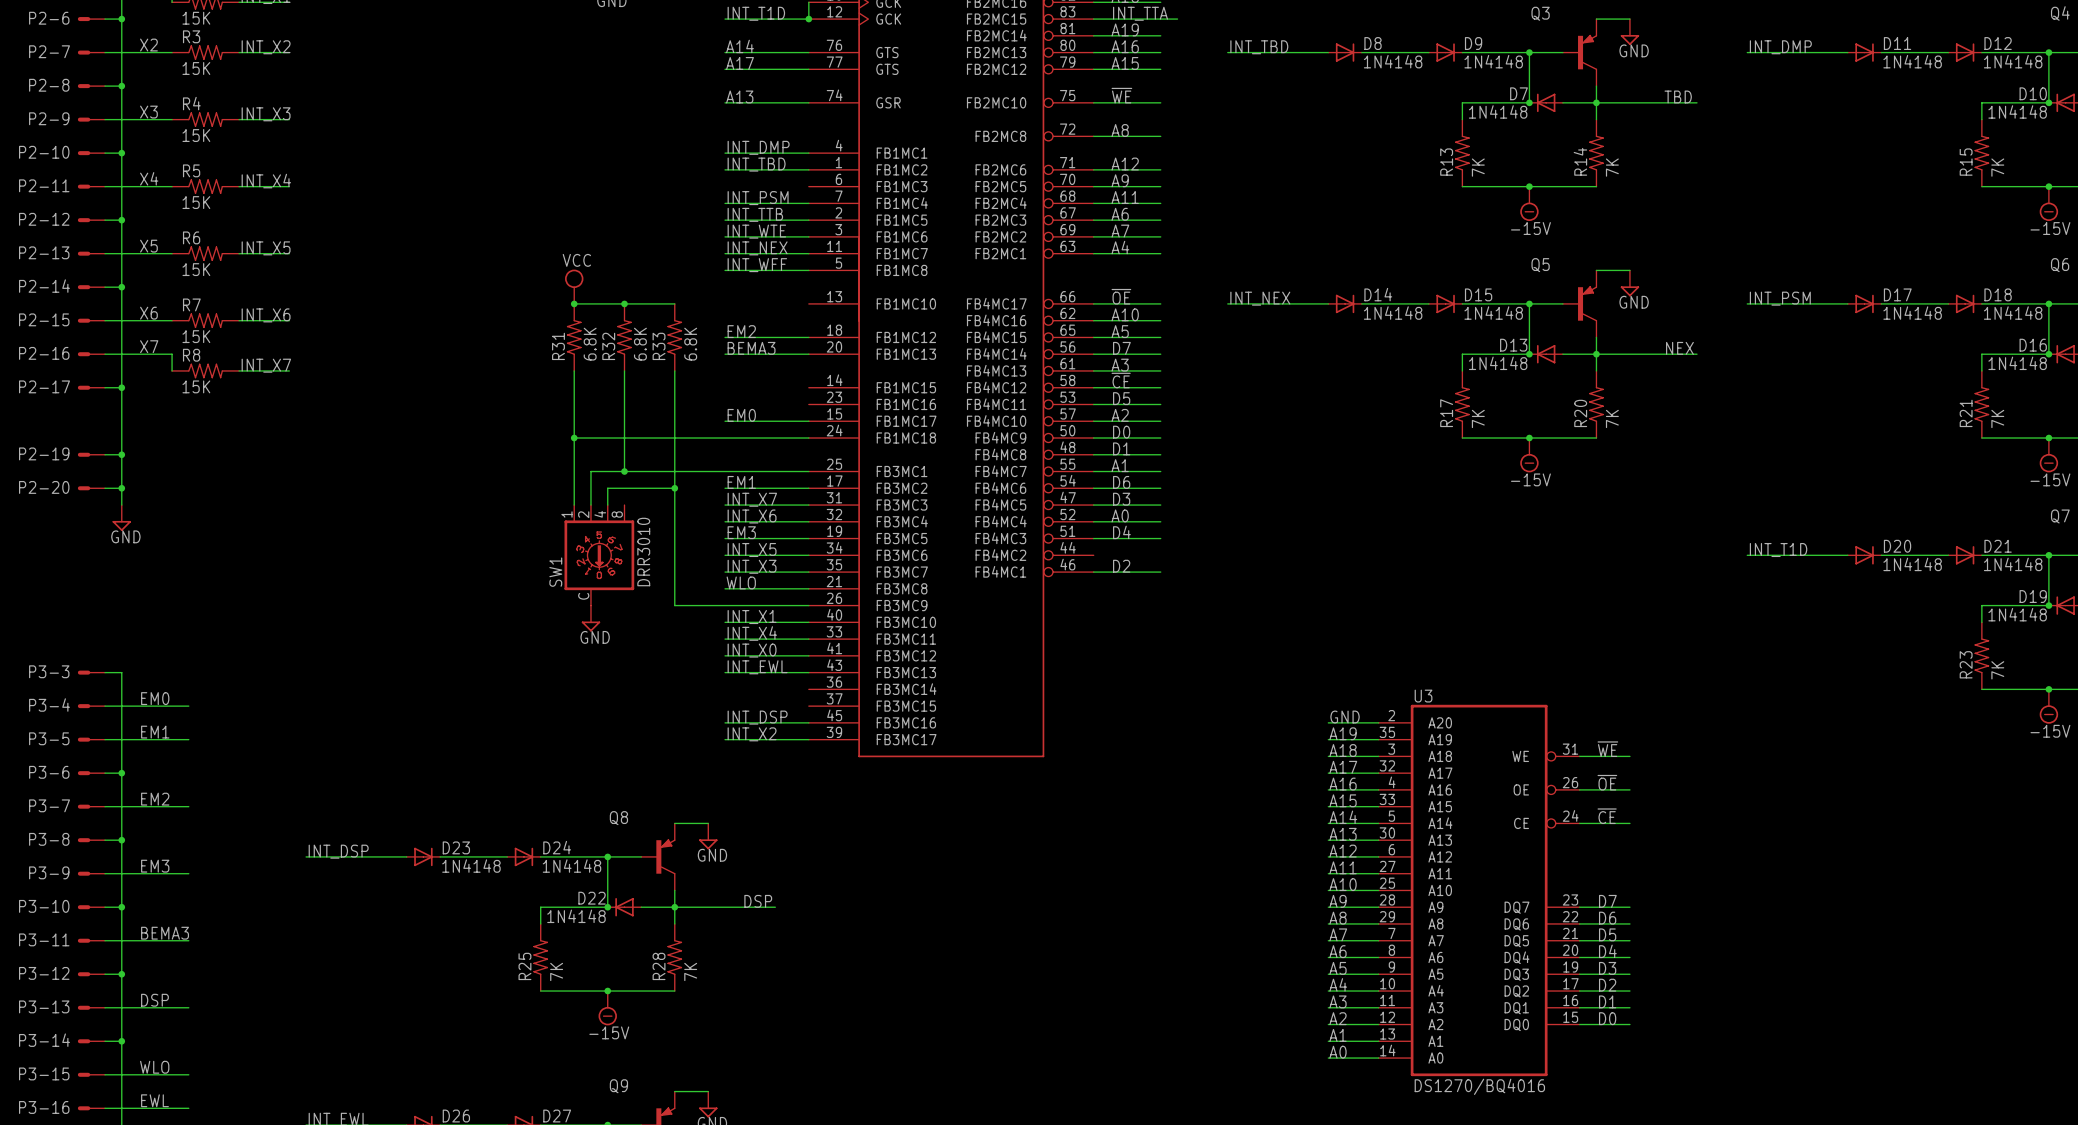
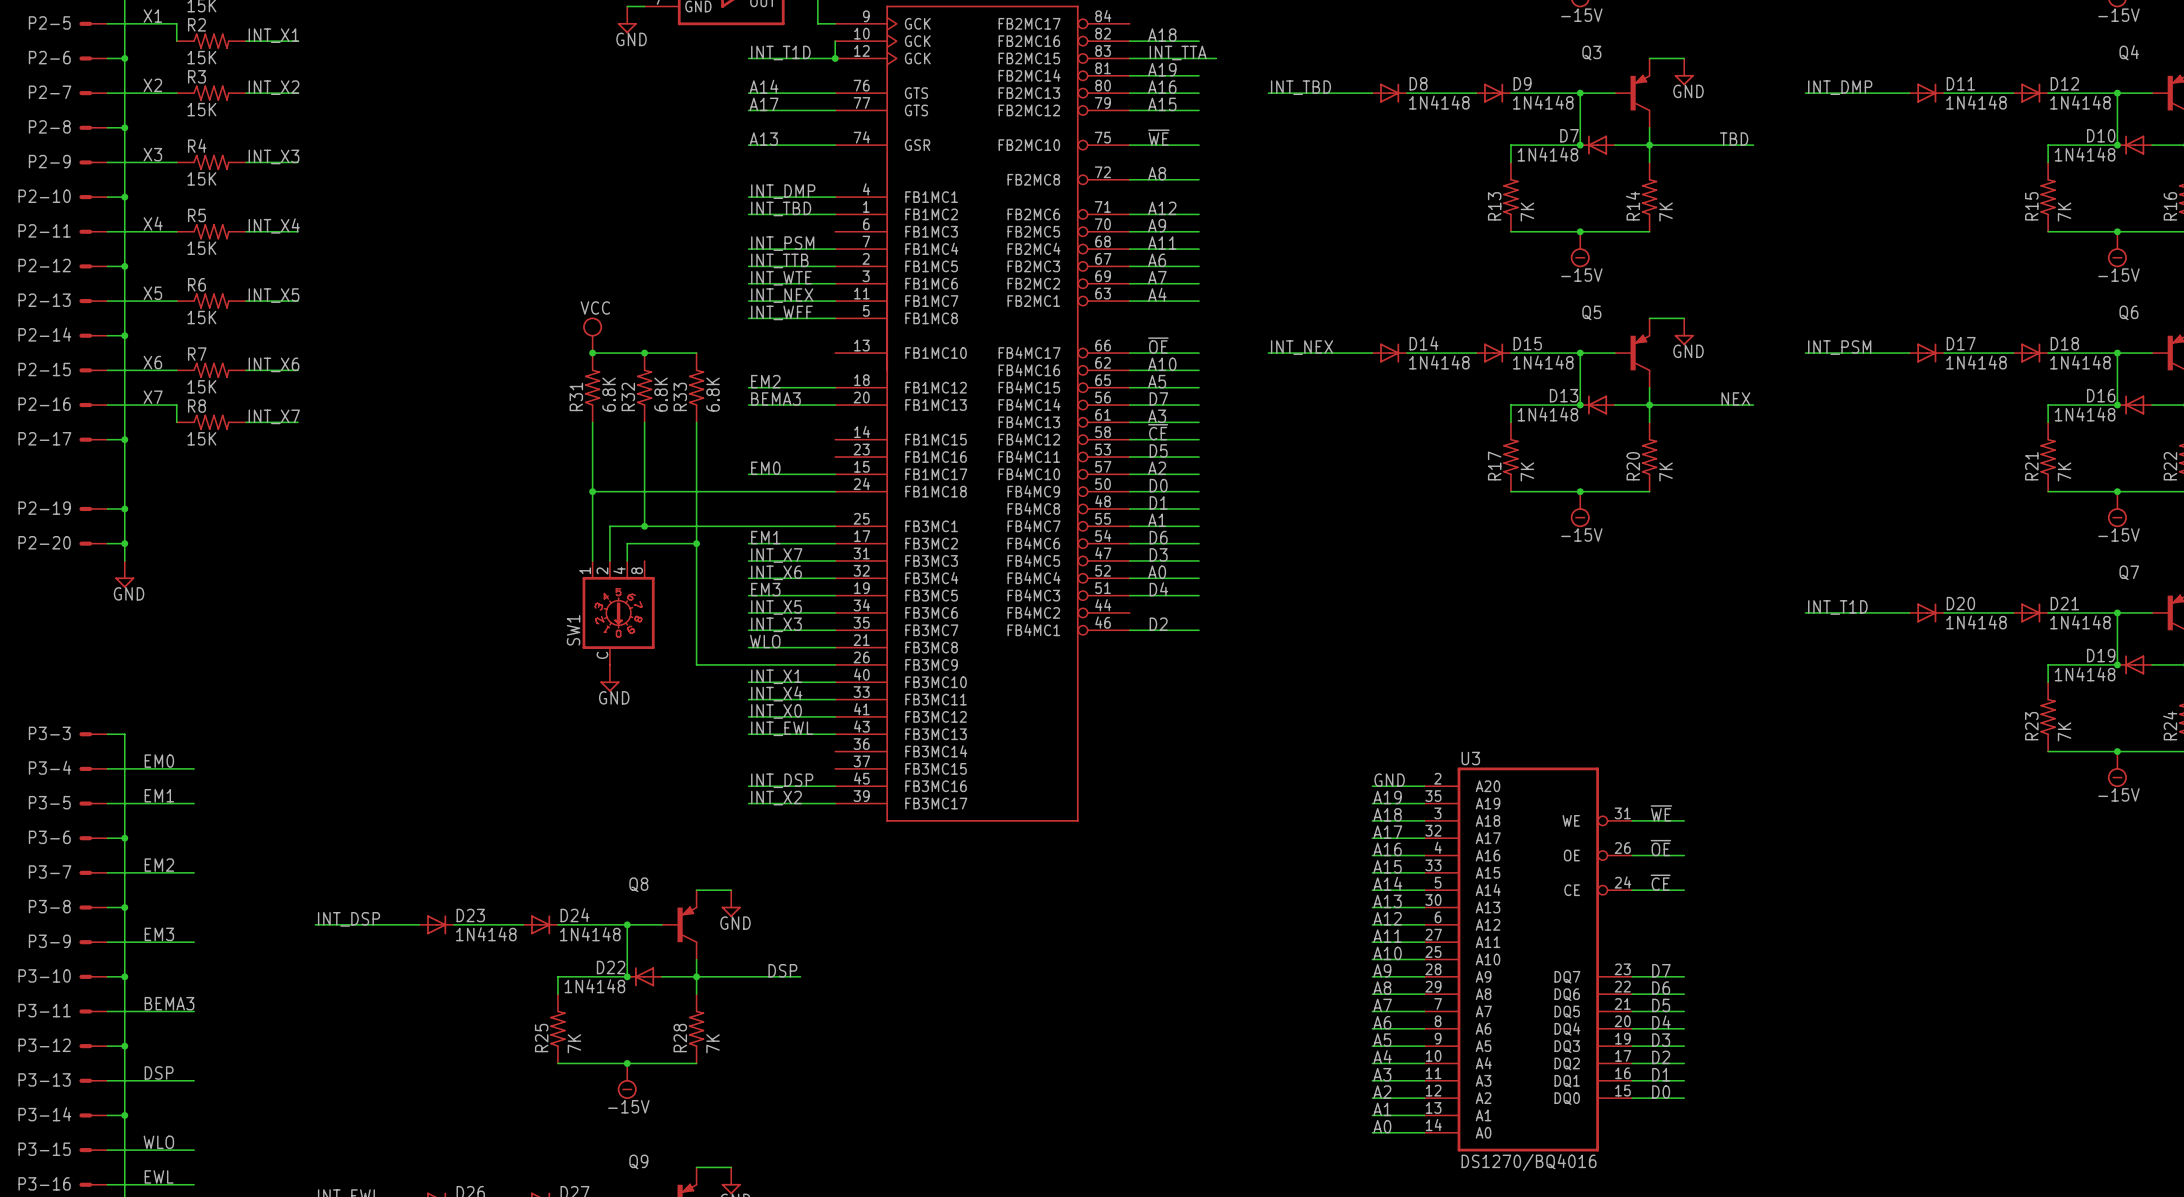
SW1 value: DRR3010 (643, 552) -> none

